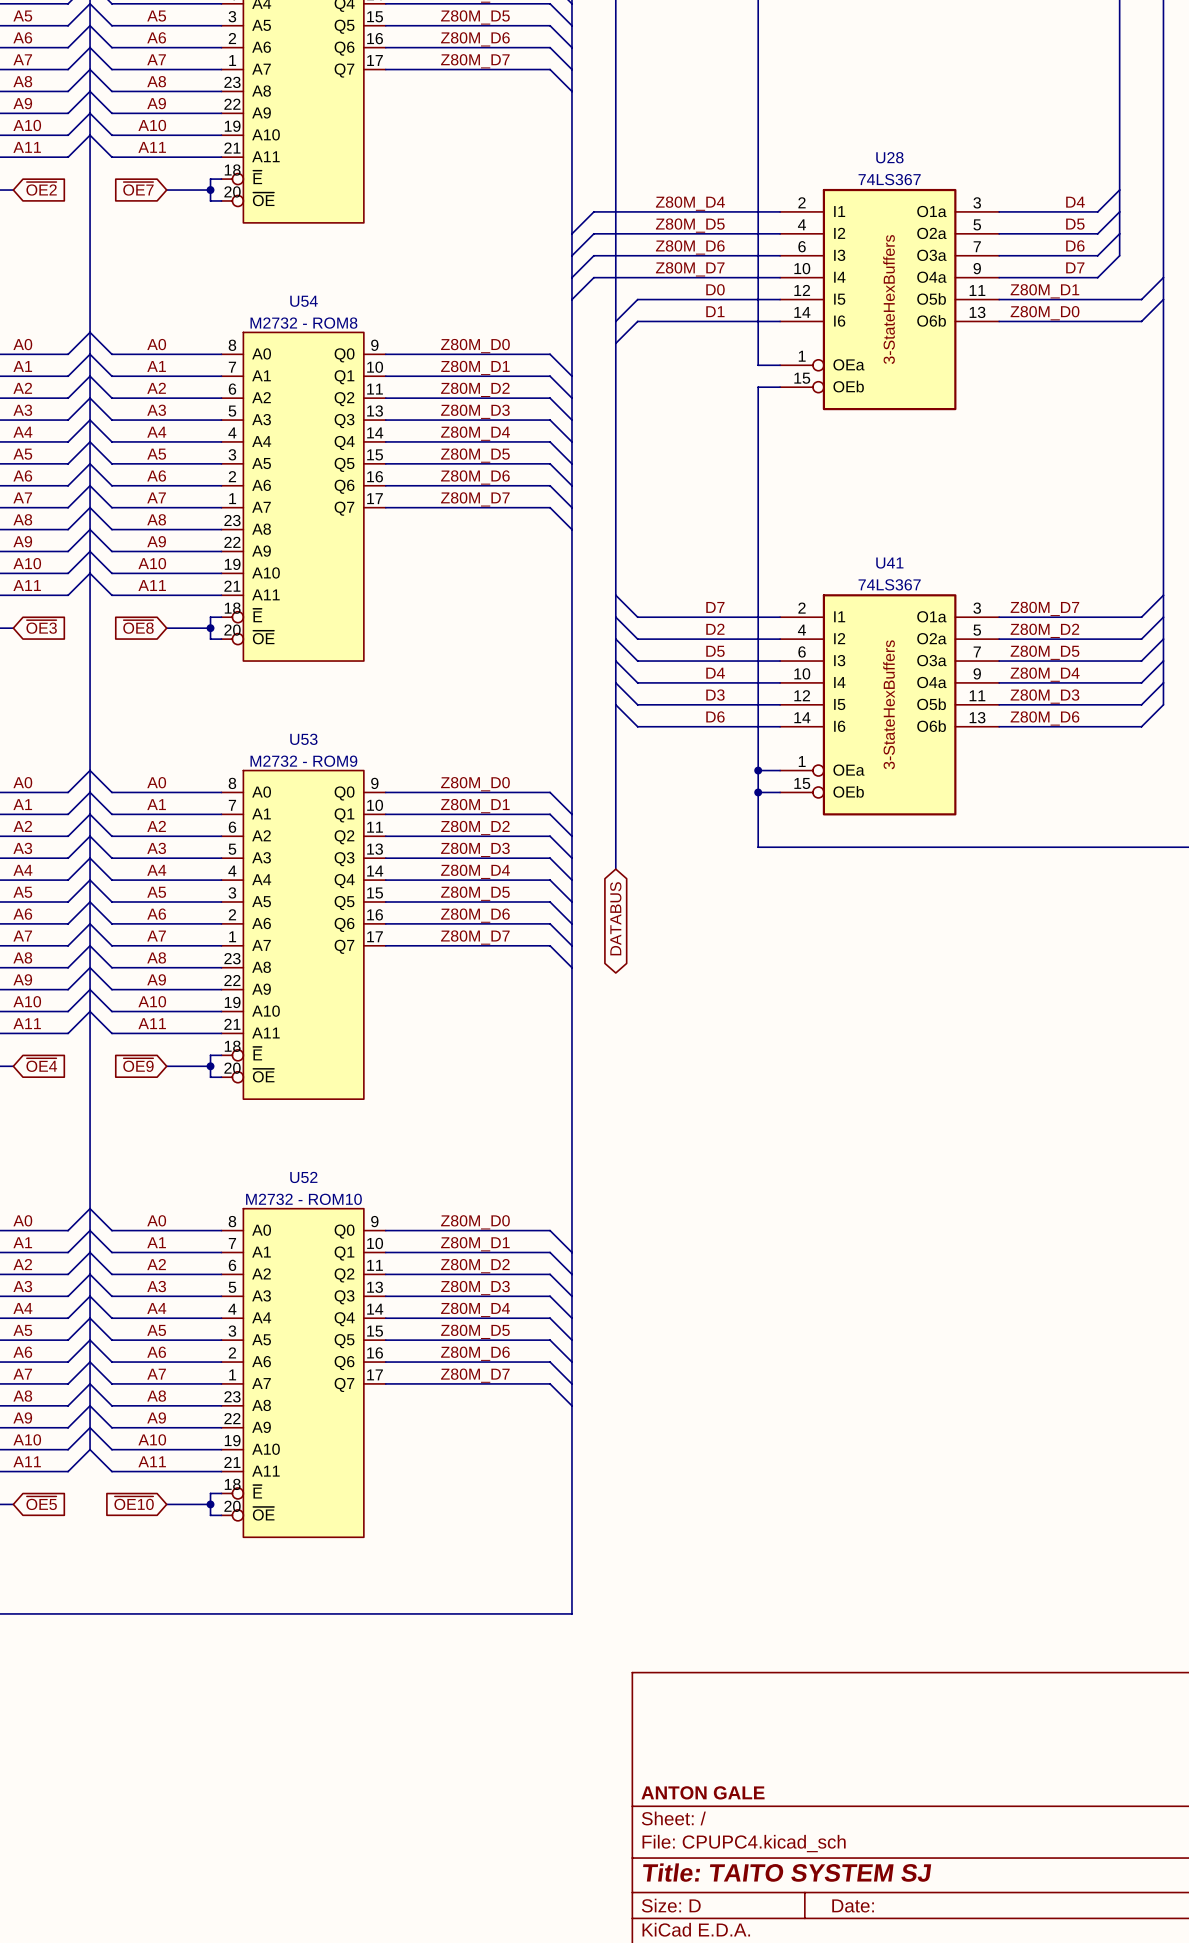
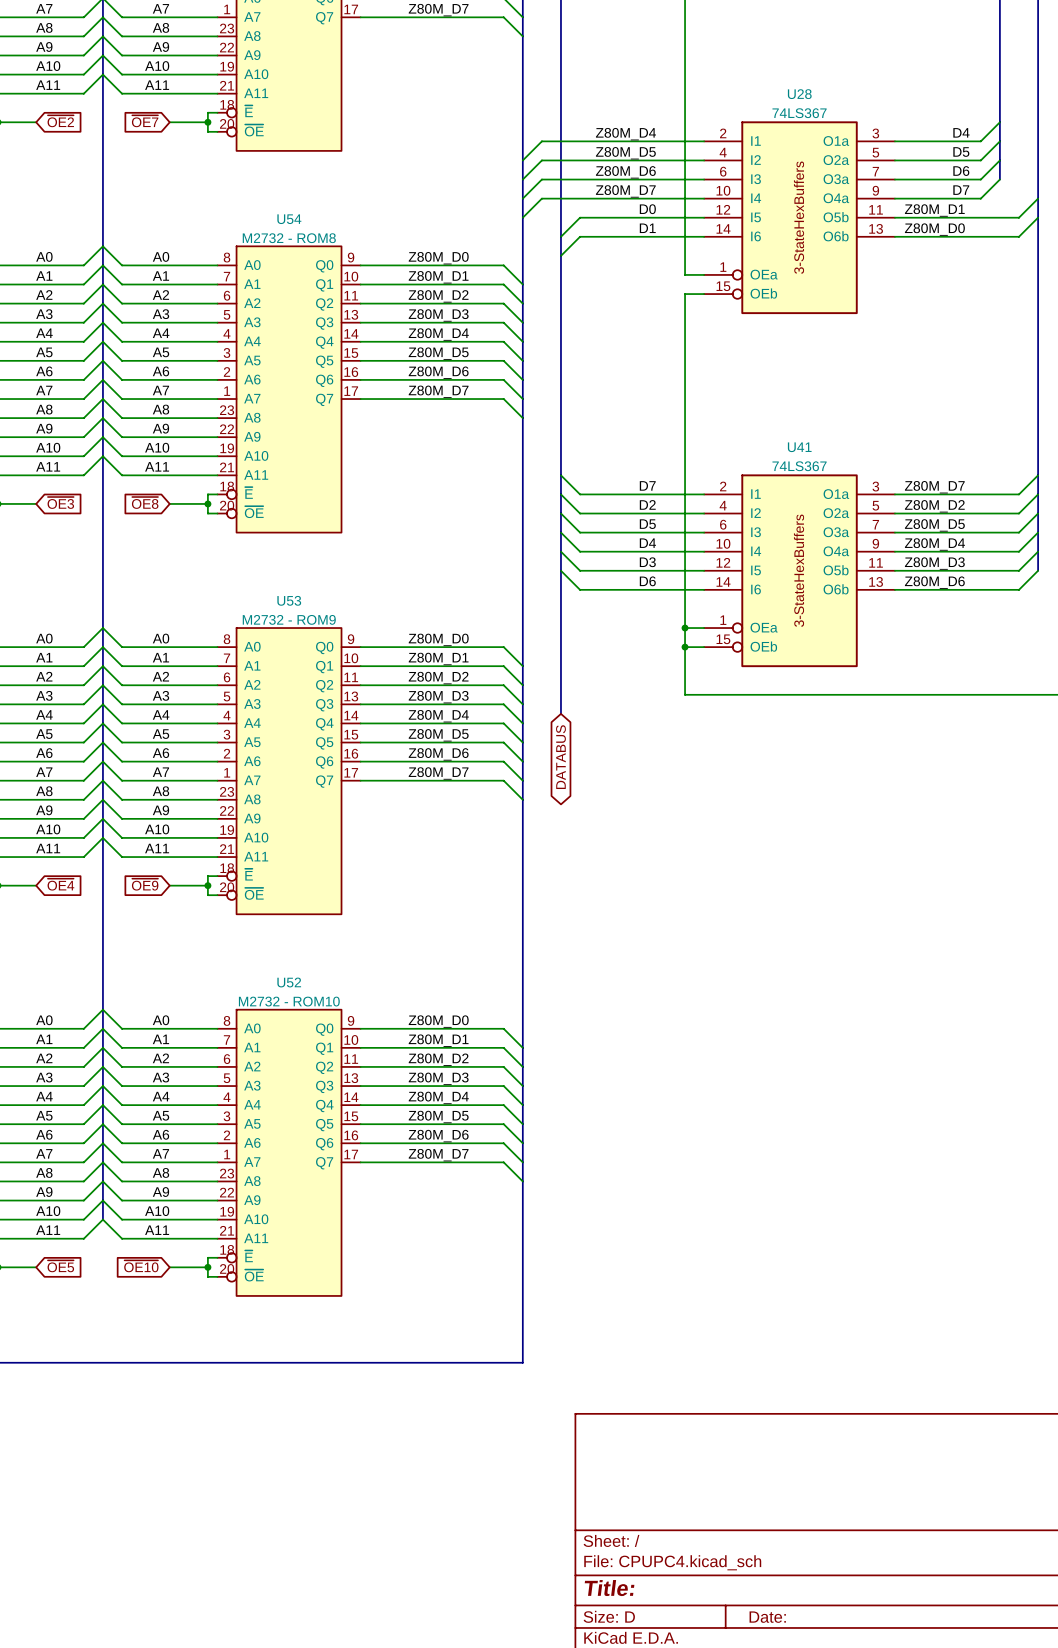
title block: ANTON GALE (703, 1792) -> none
title block: Title: TAITO SYSTEM SJ (787, 1872) -> Title: (609, 1588)

